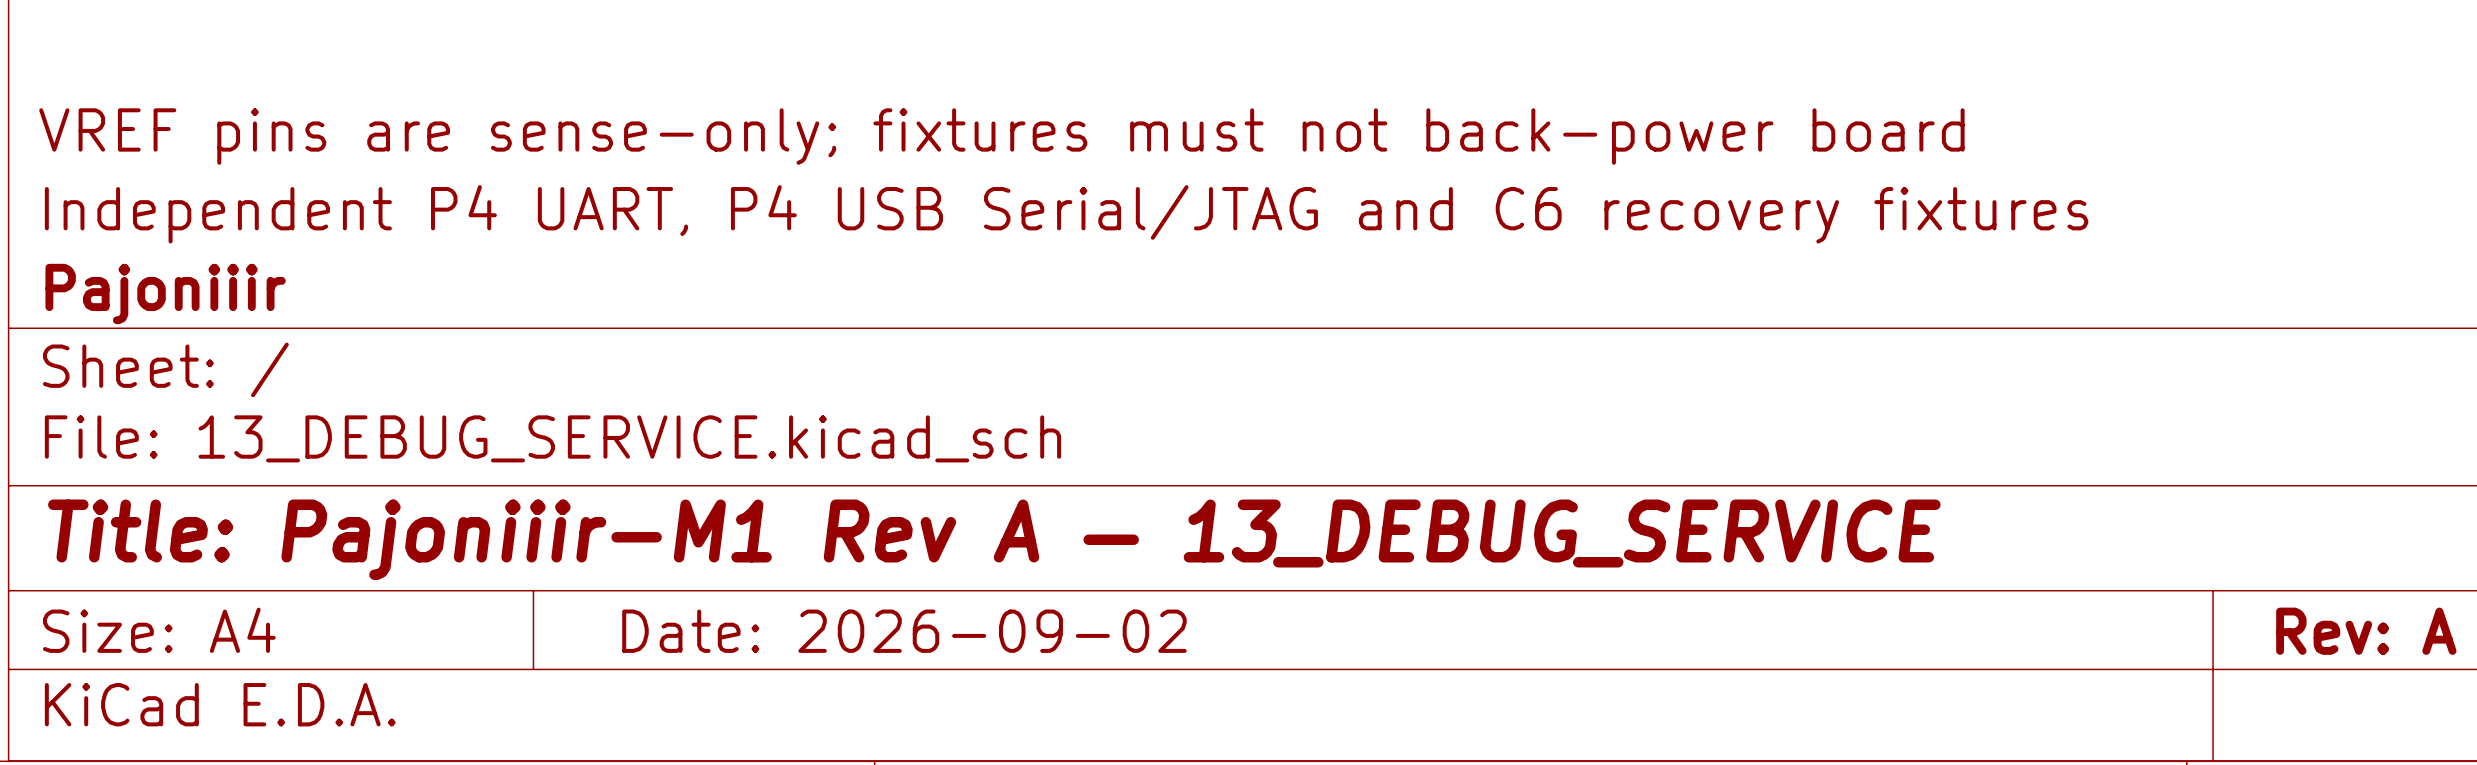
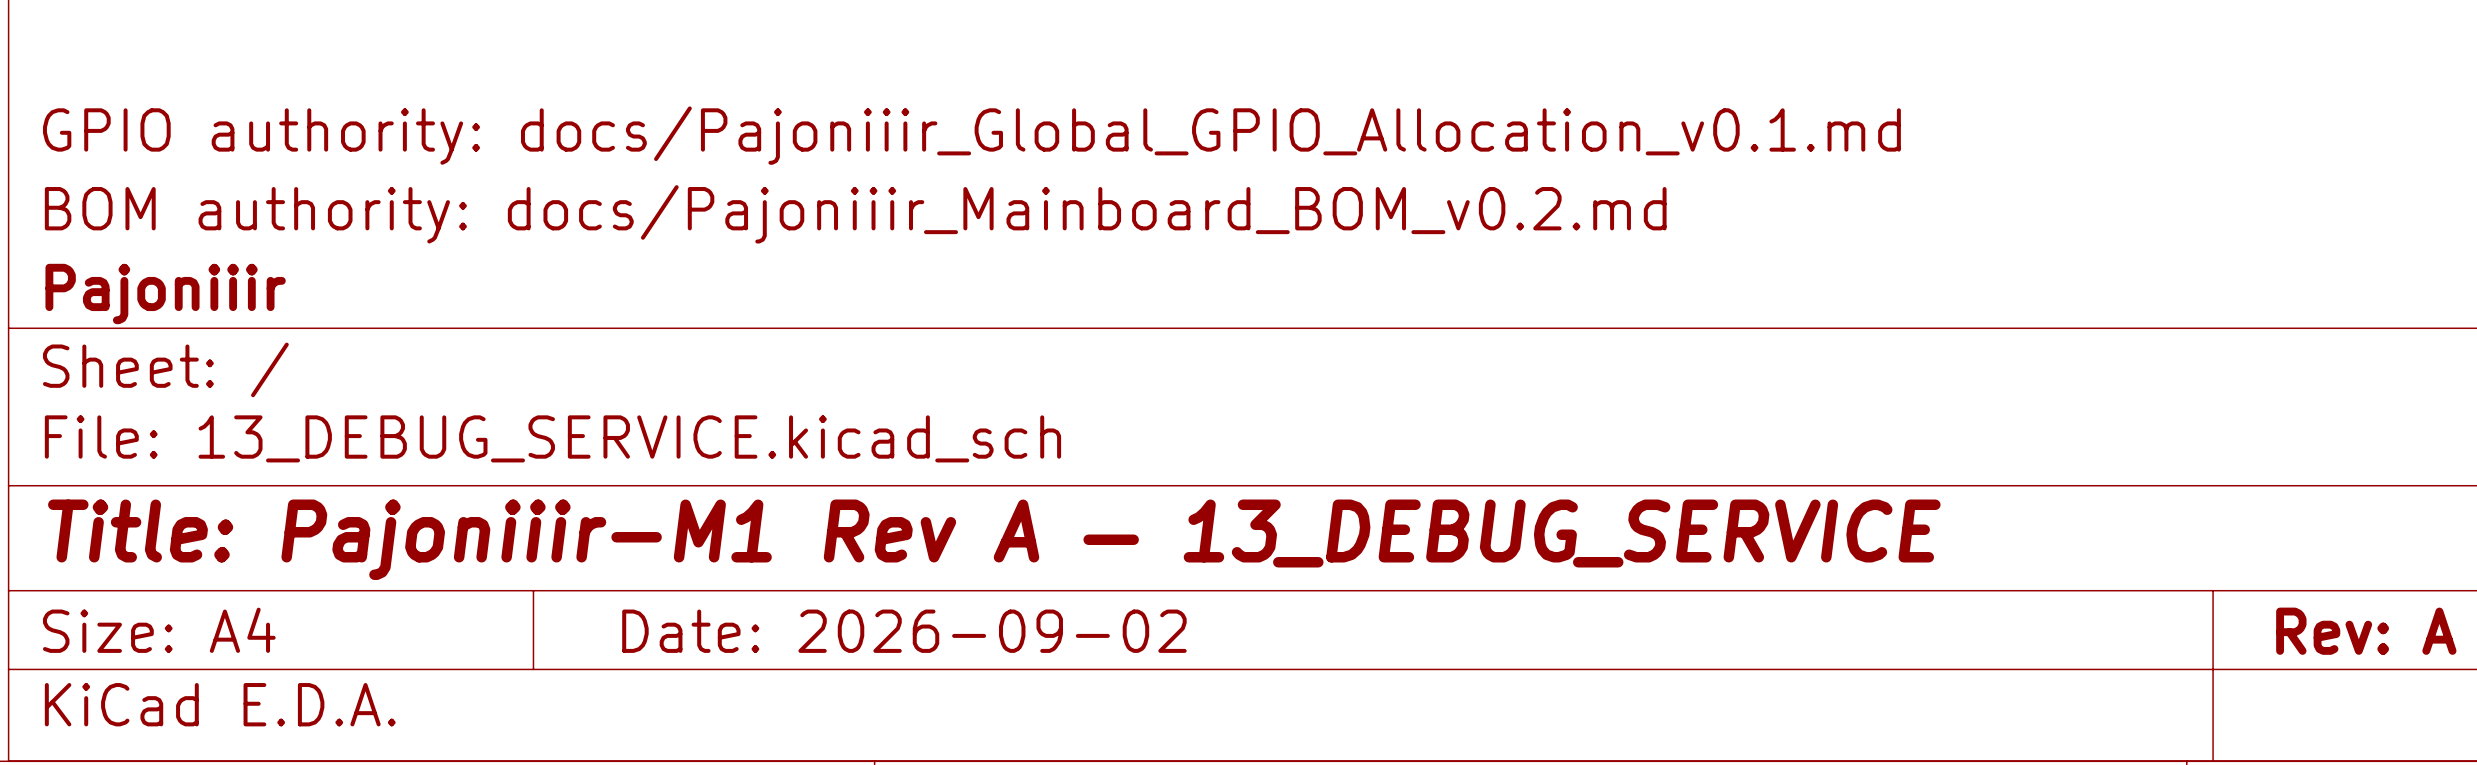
title block: VREF pins are sense-only; fixtures must not back-power board (1001, 136) -> GPIO authority: docs/Pajoniiir_Global_GPIO_Allocation_v0.1.md (971, 135)
title block: Independent P4 UART, P4 USB Serial/JTAG and C6 recovery fixtures (1066, 214) -> BOM authority: docs/Pajoniiir_Mainboard_BOM_v0.2.md (855, 214)

